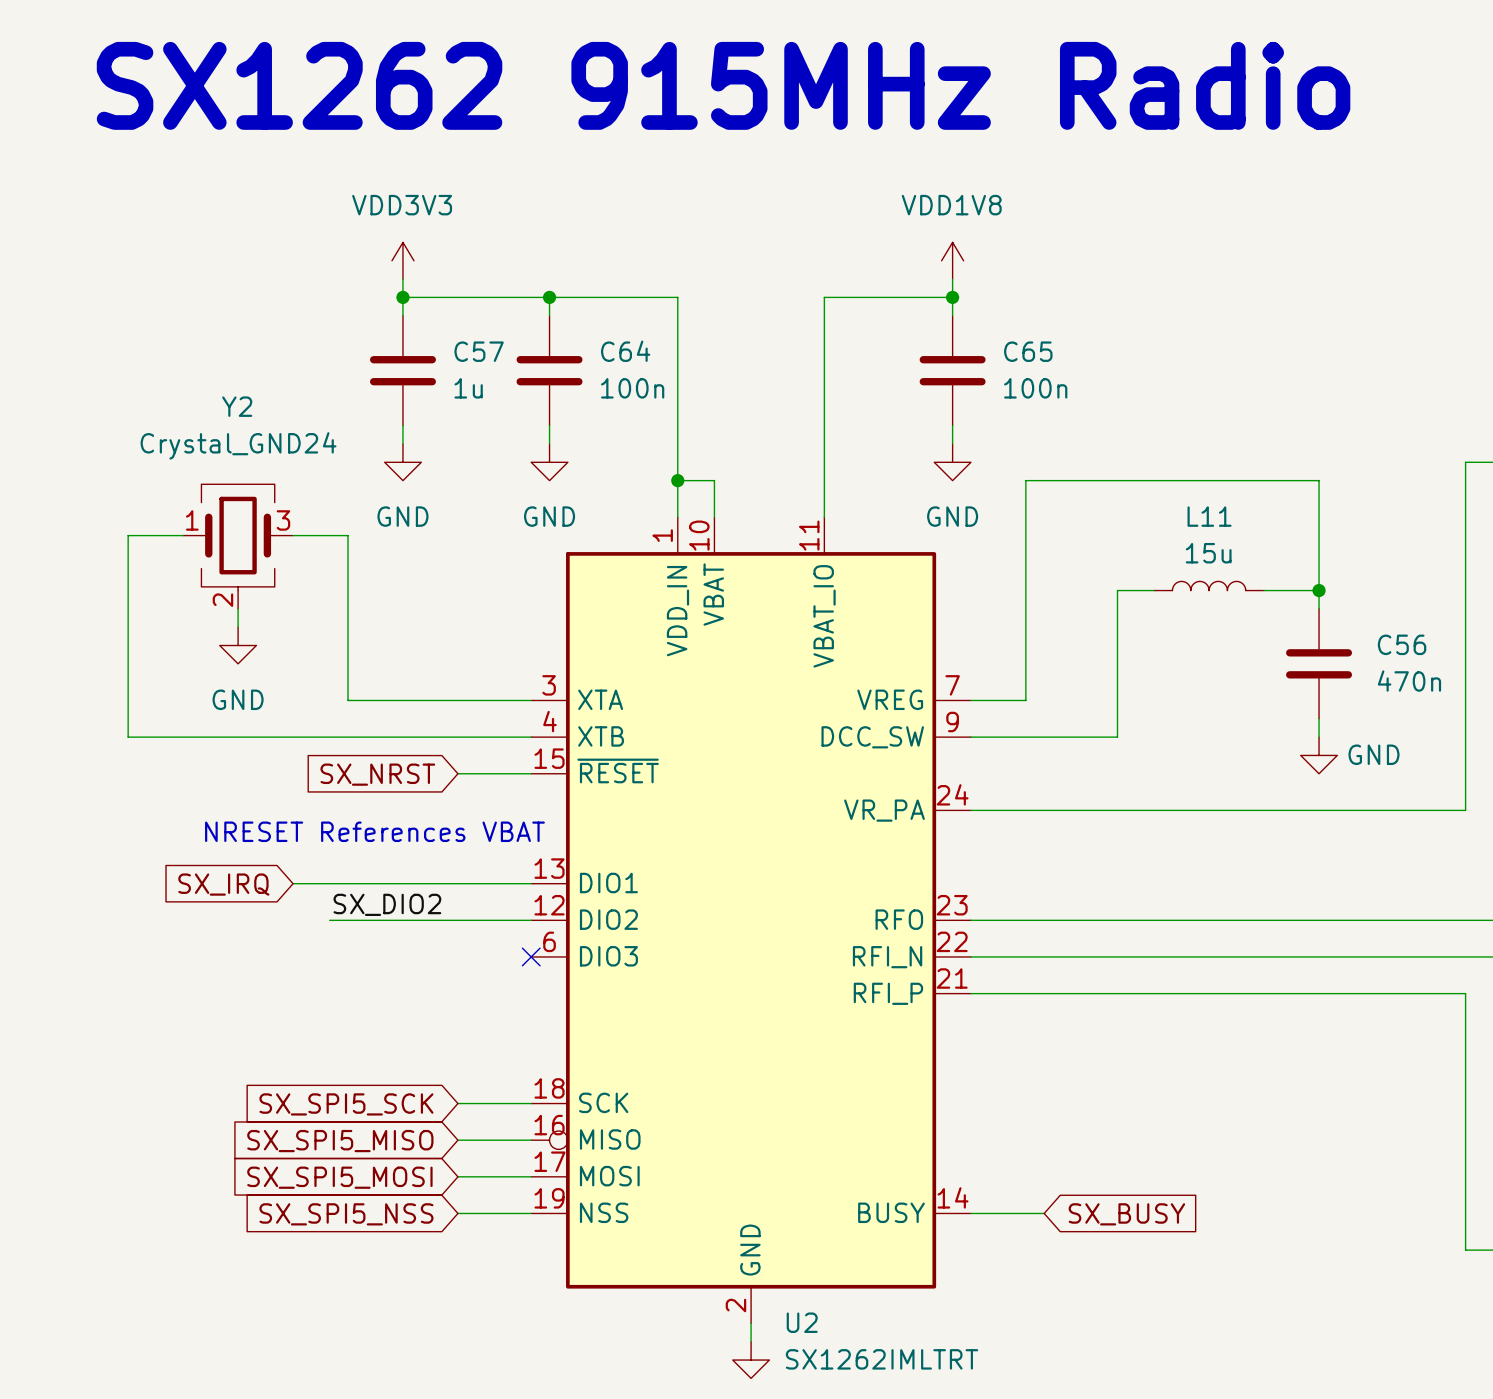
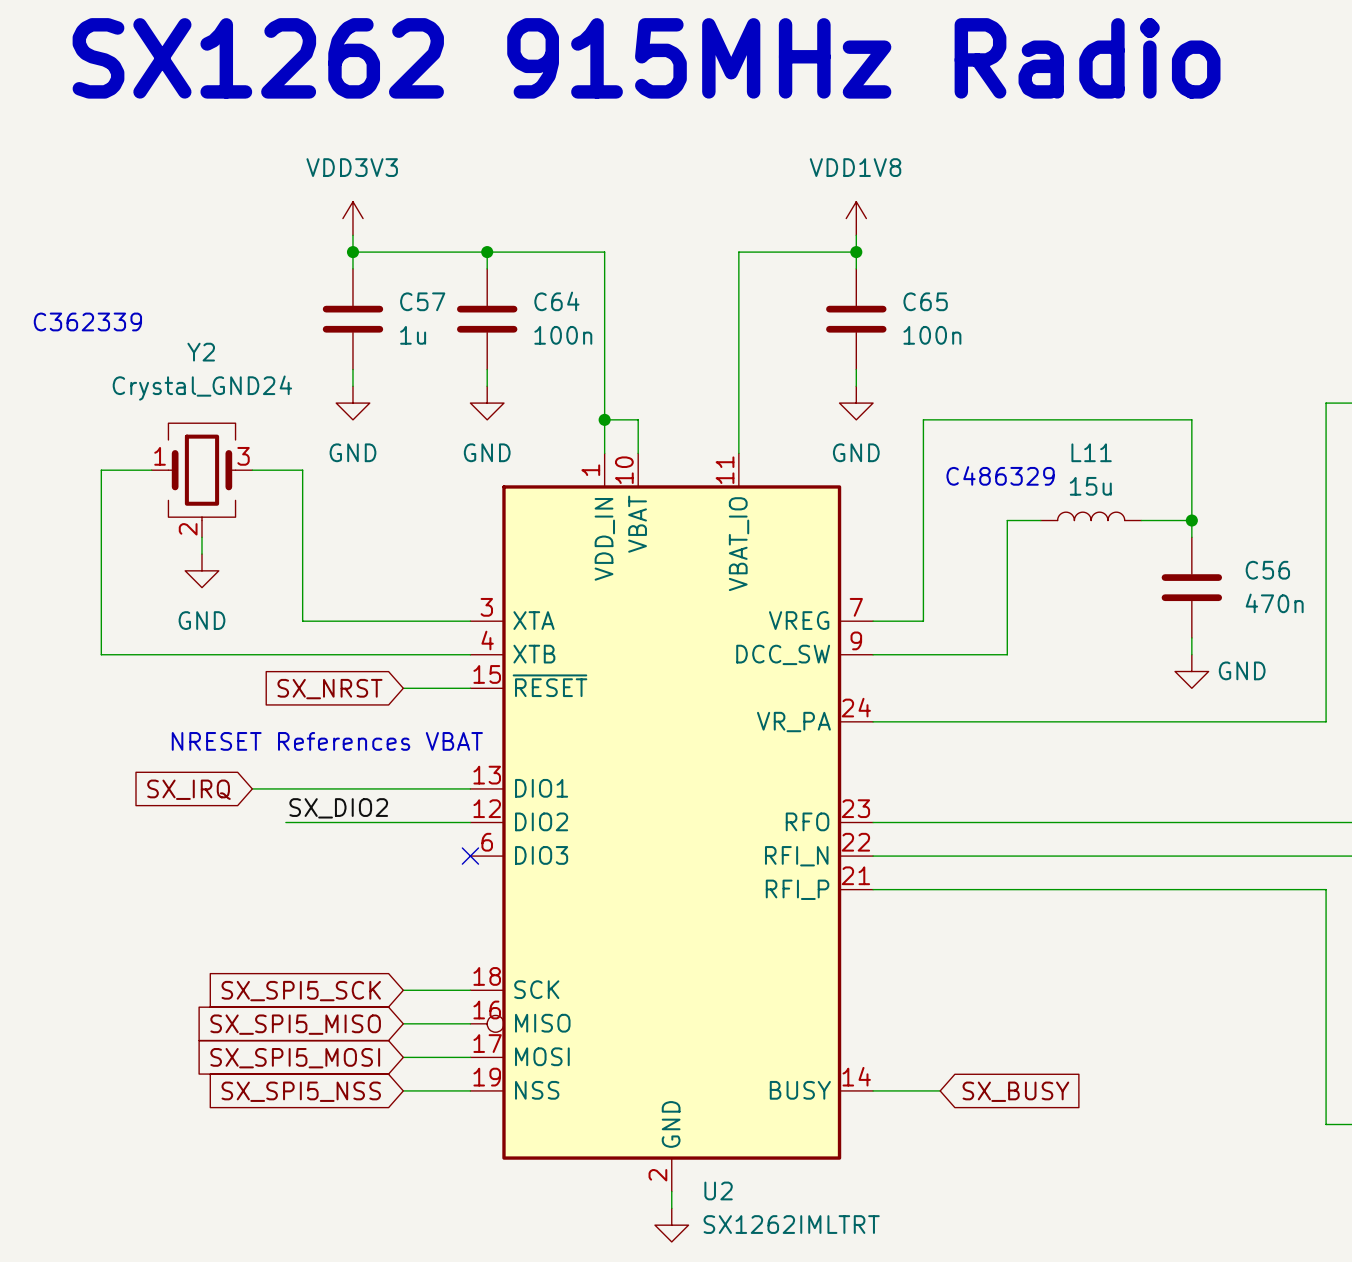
text: none -> C362339 (87, 321)
text: none -> C486329 (1000, 475)

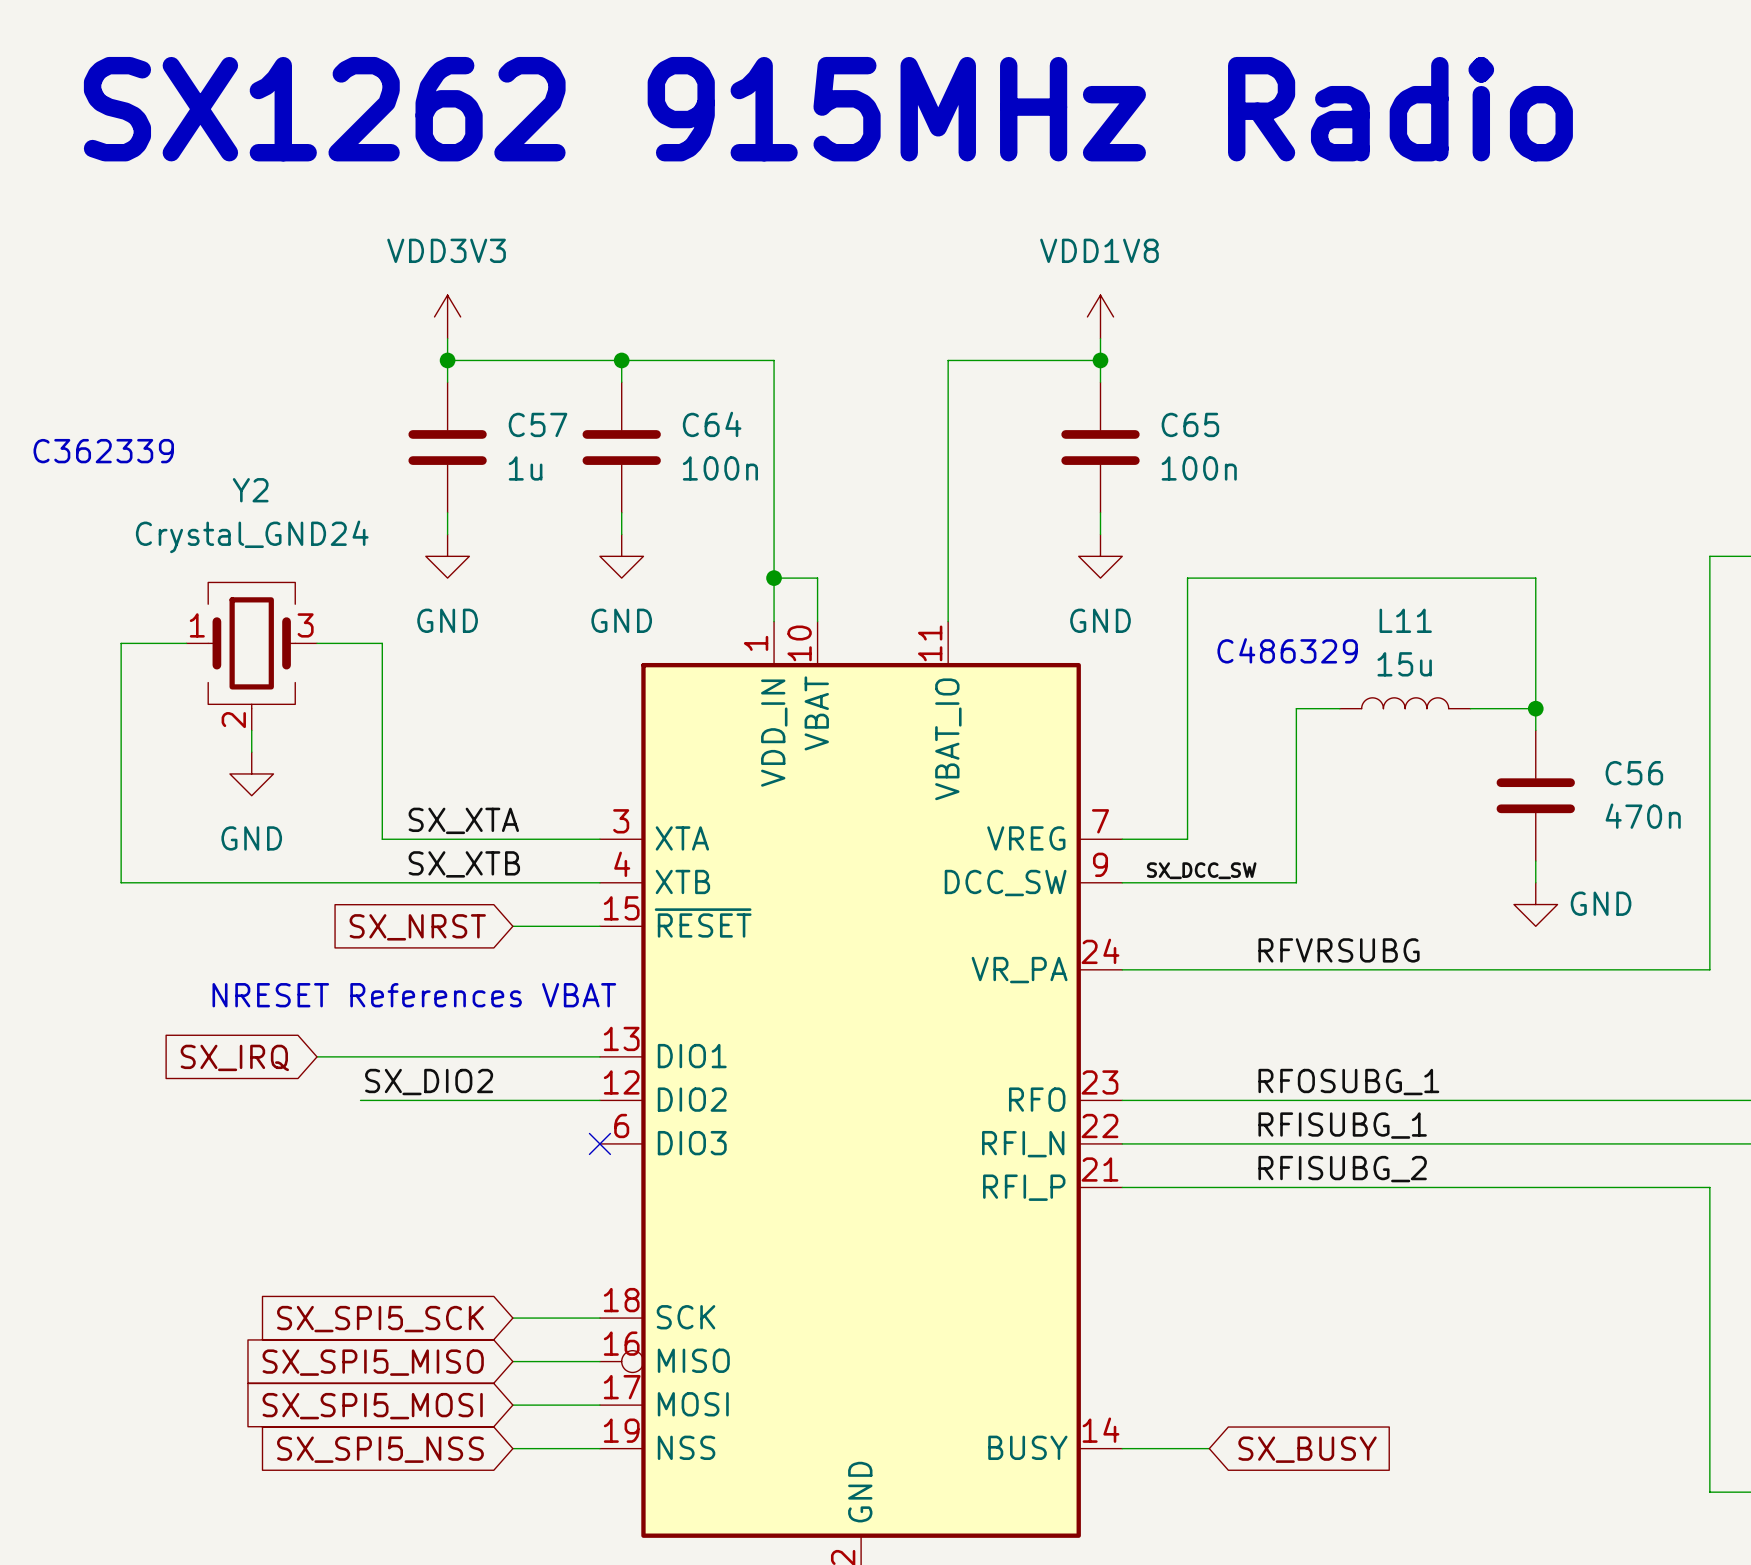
label: none -> SX_XTA (463, 820)
label: none -> SX_XTB (464, 864)
label: none -> SX_DCC_SW (1201, 870)
label: none -> RFVRSUBG (1339, 950)
label: none -> RFOSUBG_1 (1348, 1082)
label: none -> RFISUBG_1 (1342, 1125)
label: none -> RFISUBG_2 (1342, 1169)

